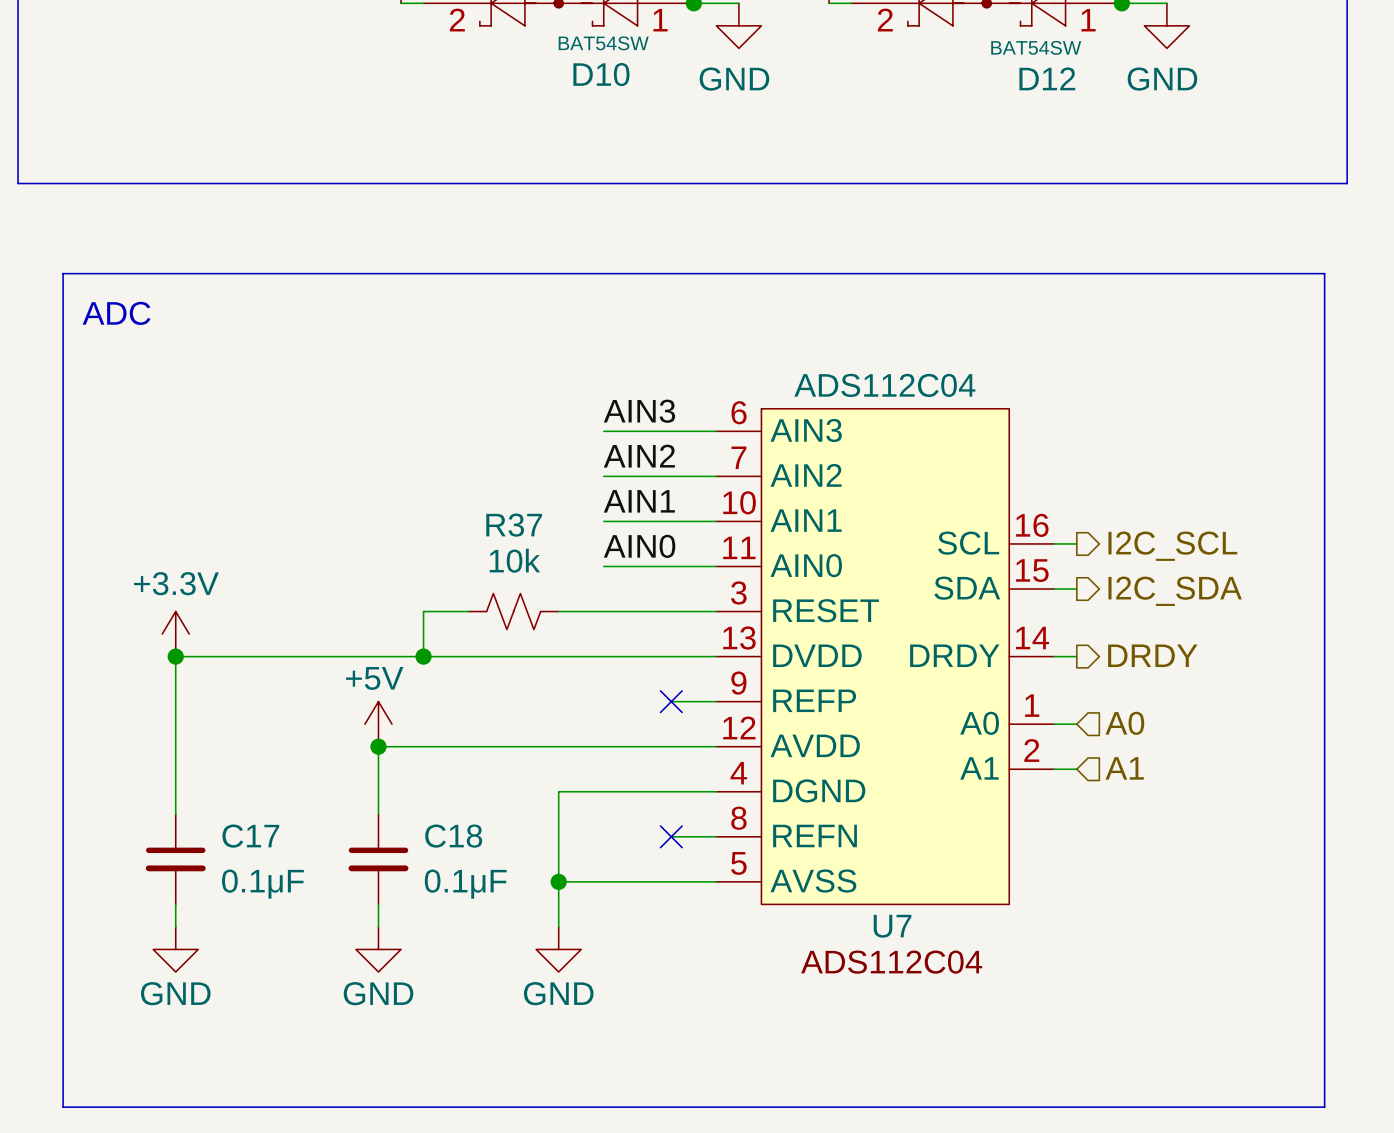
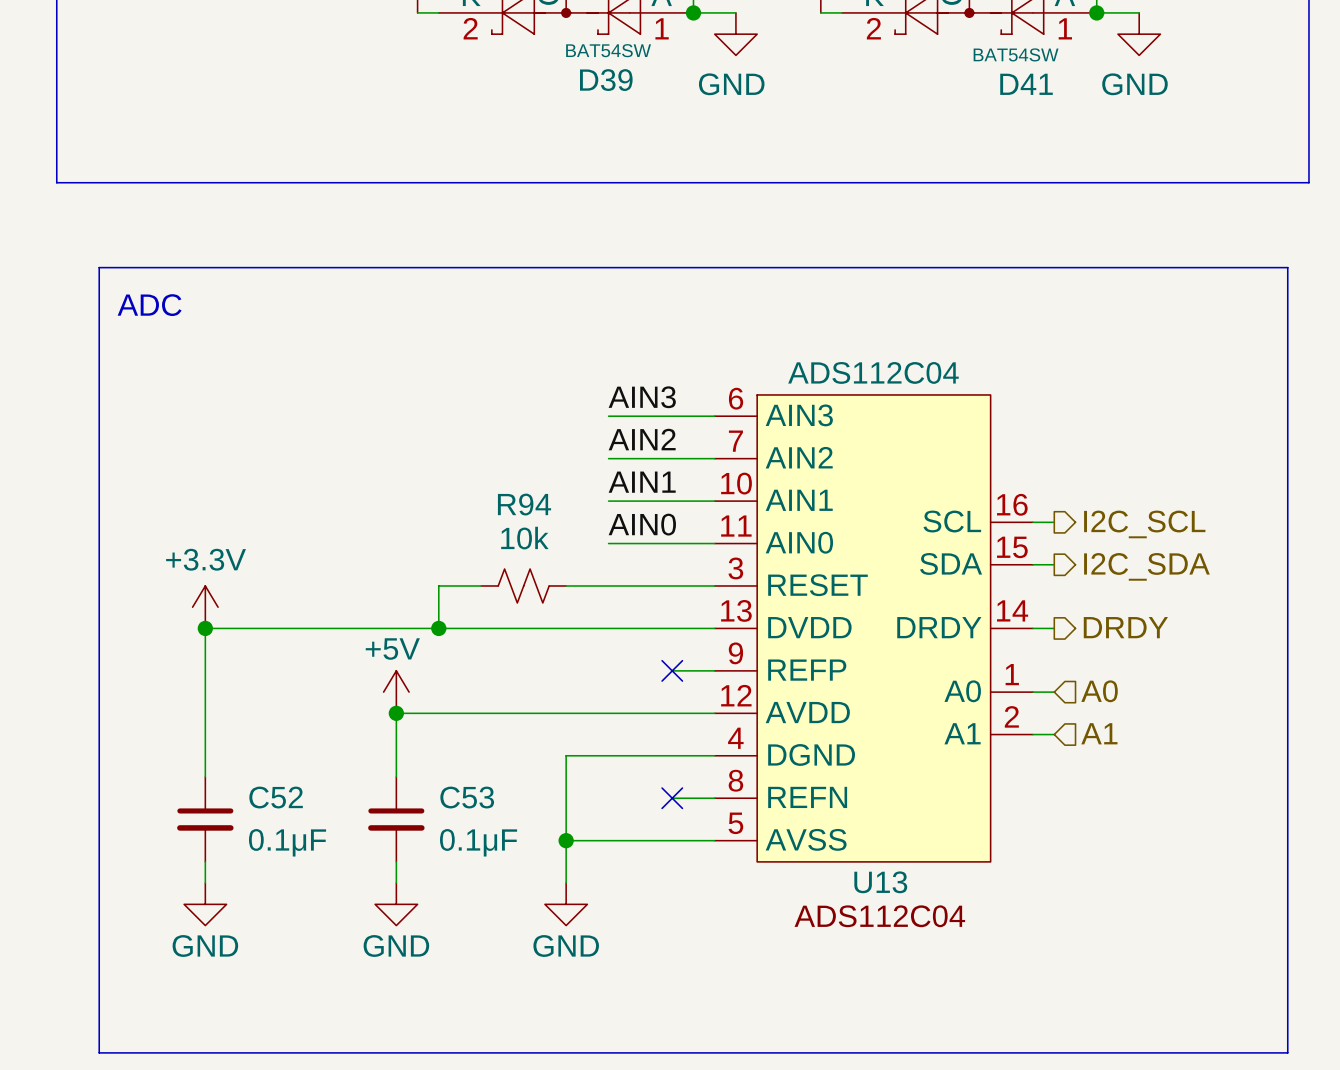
D10 name: D10 (601, 74) -> D39 (606, 80)
D12 name: D12 (1047, 78) -> D41 (1026, 84)
R37 name: R37 (514, 525) -> R94 (524, 504)
C17 name: C17 (250, 836) -> C52 (276, 797)
C18 name: C18 (453, 836) -> C53 (467, 797)
U7 name: U7 (892, 926) -> U13 (880, 882)

